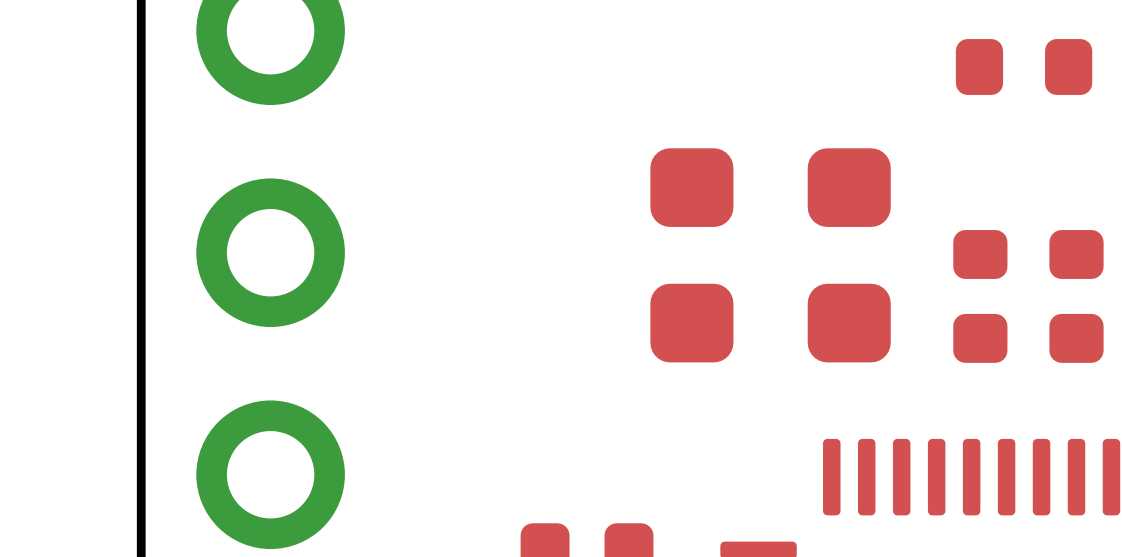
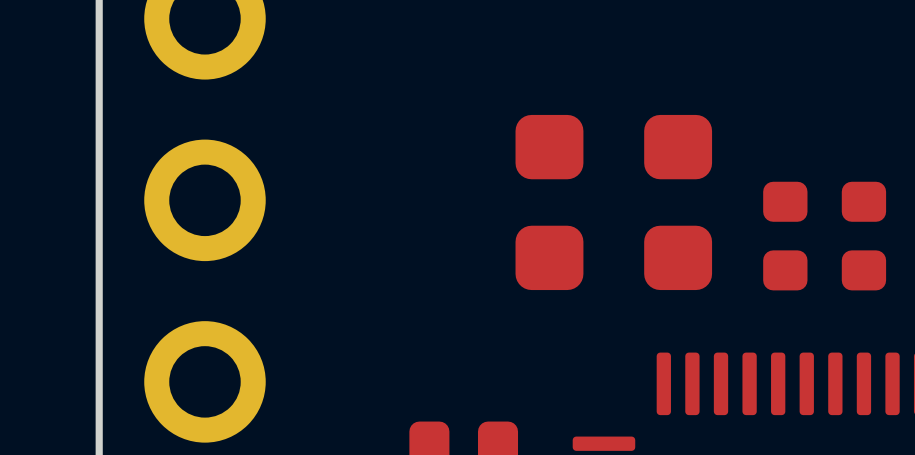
part: (1024, 66) -> none

